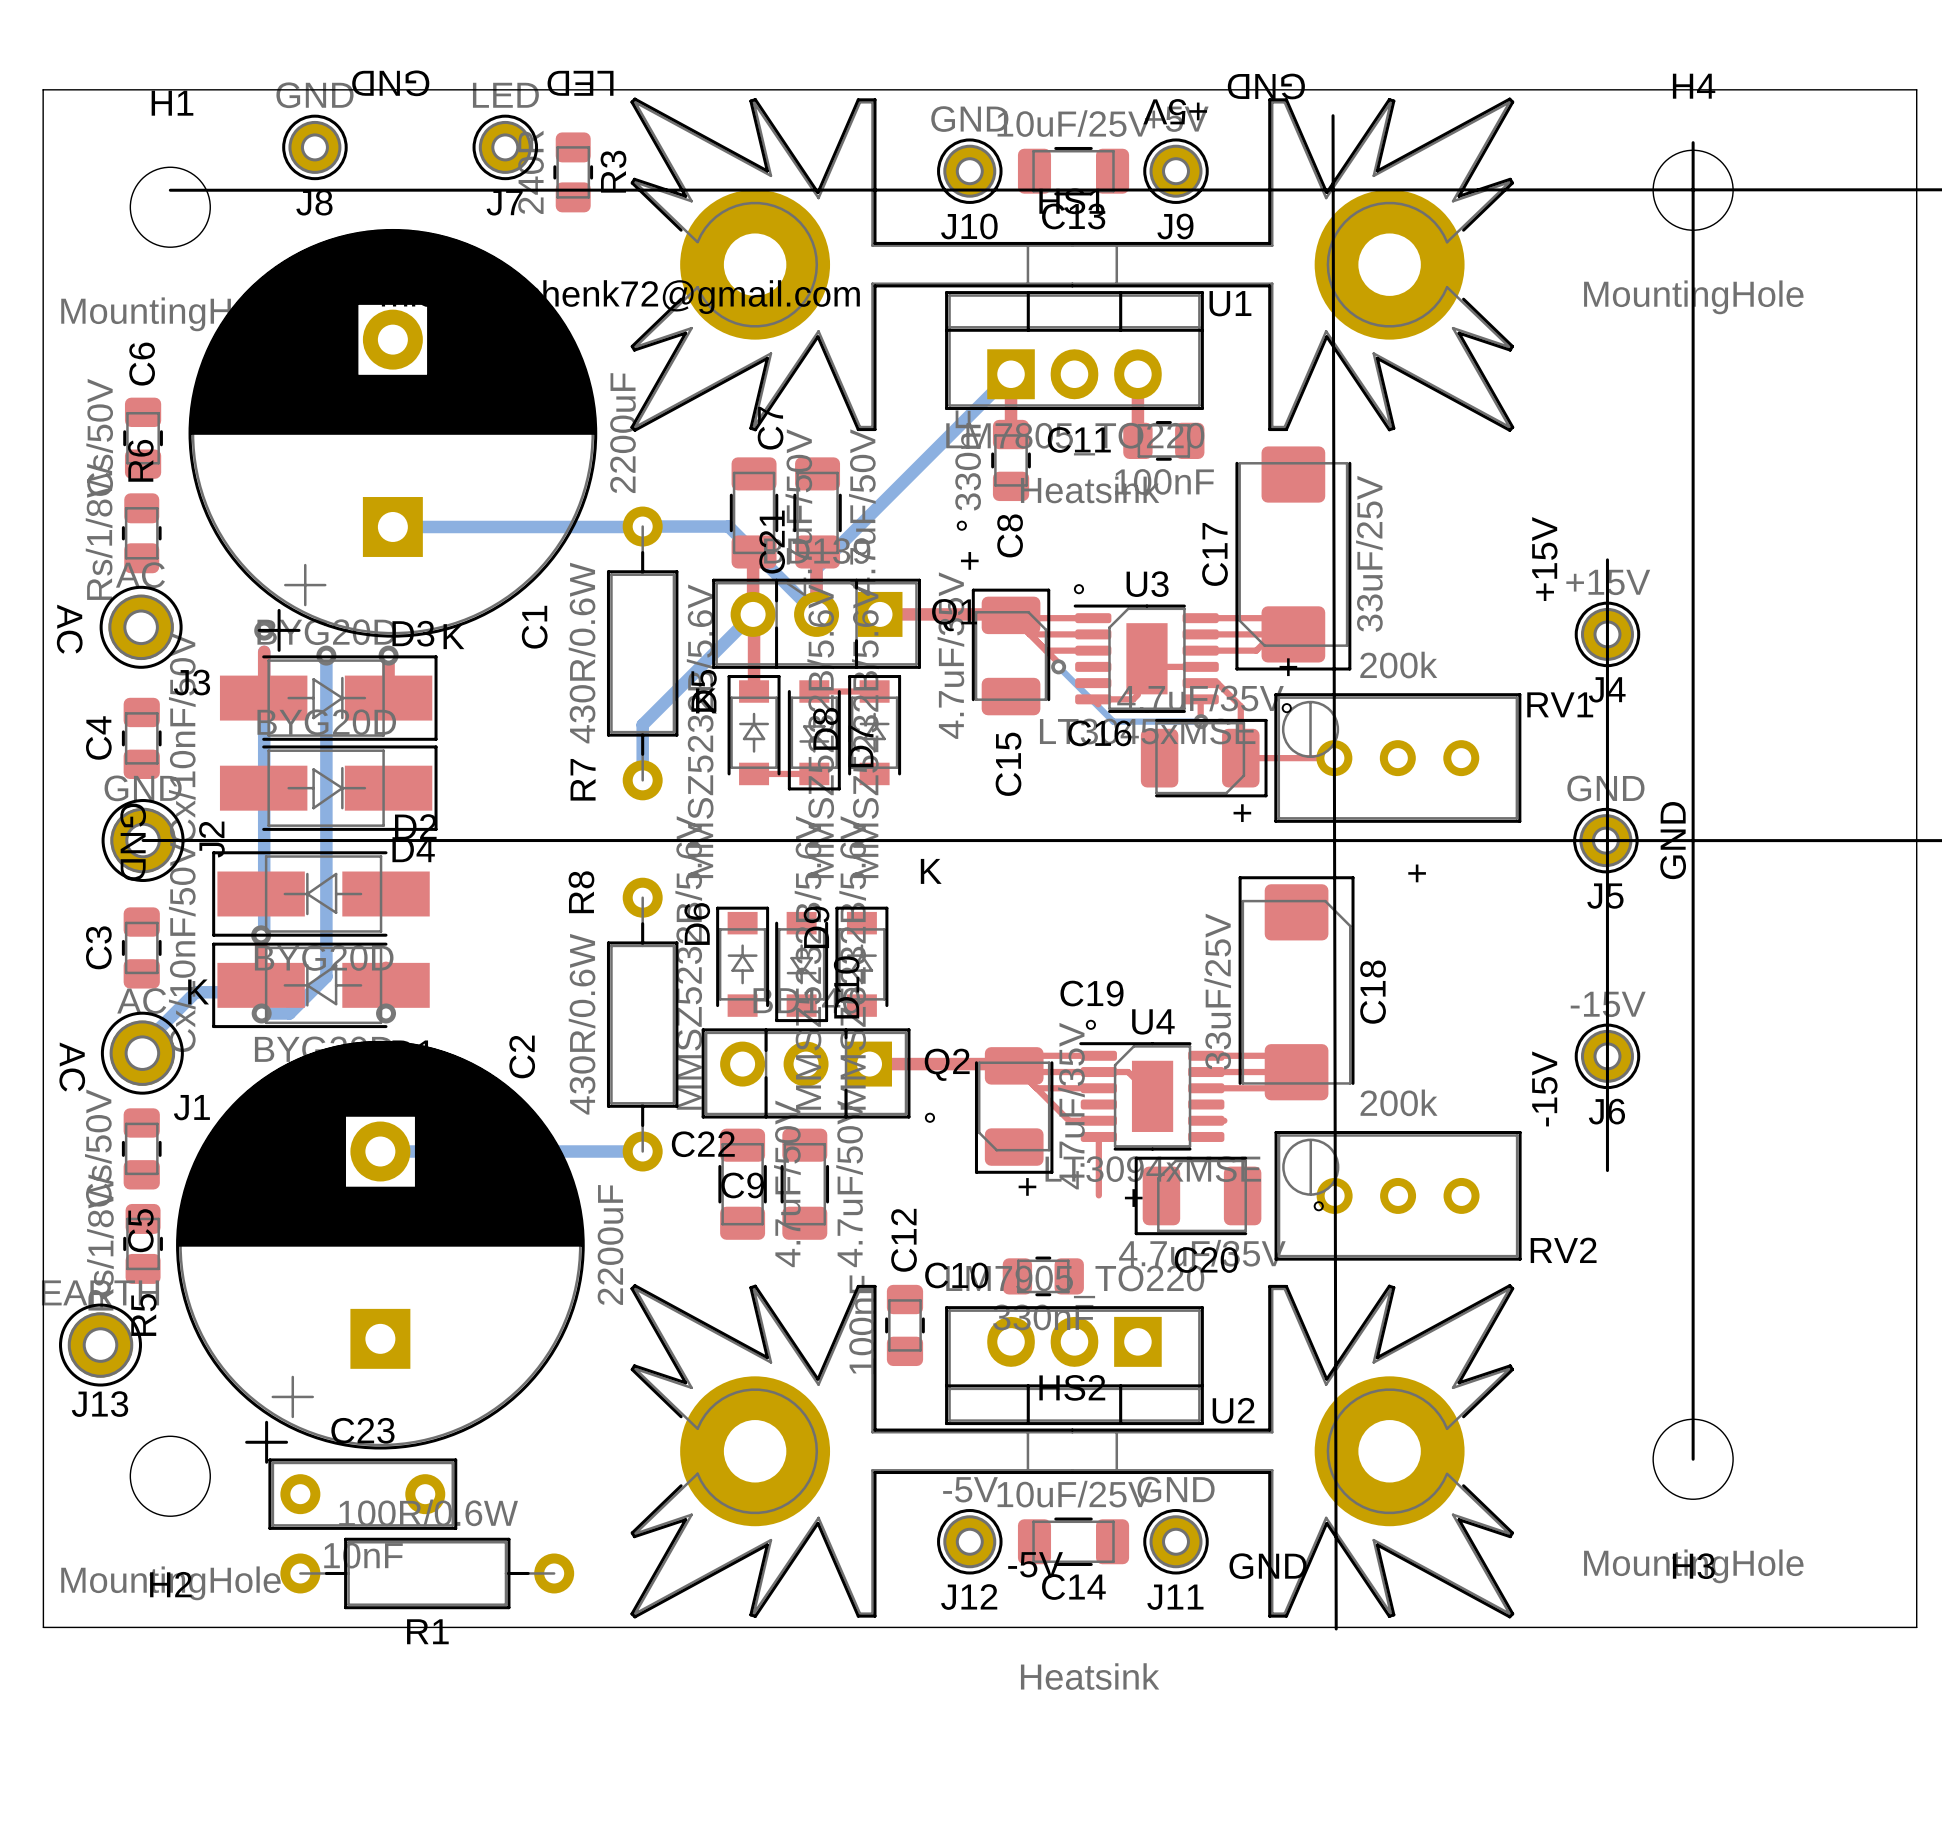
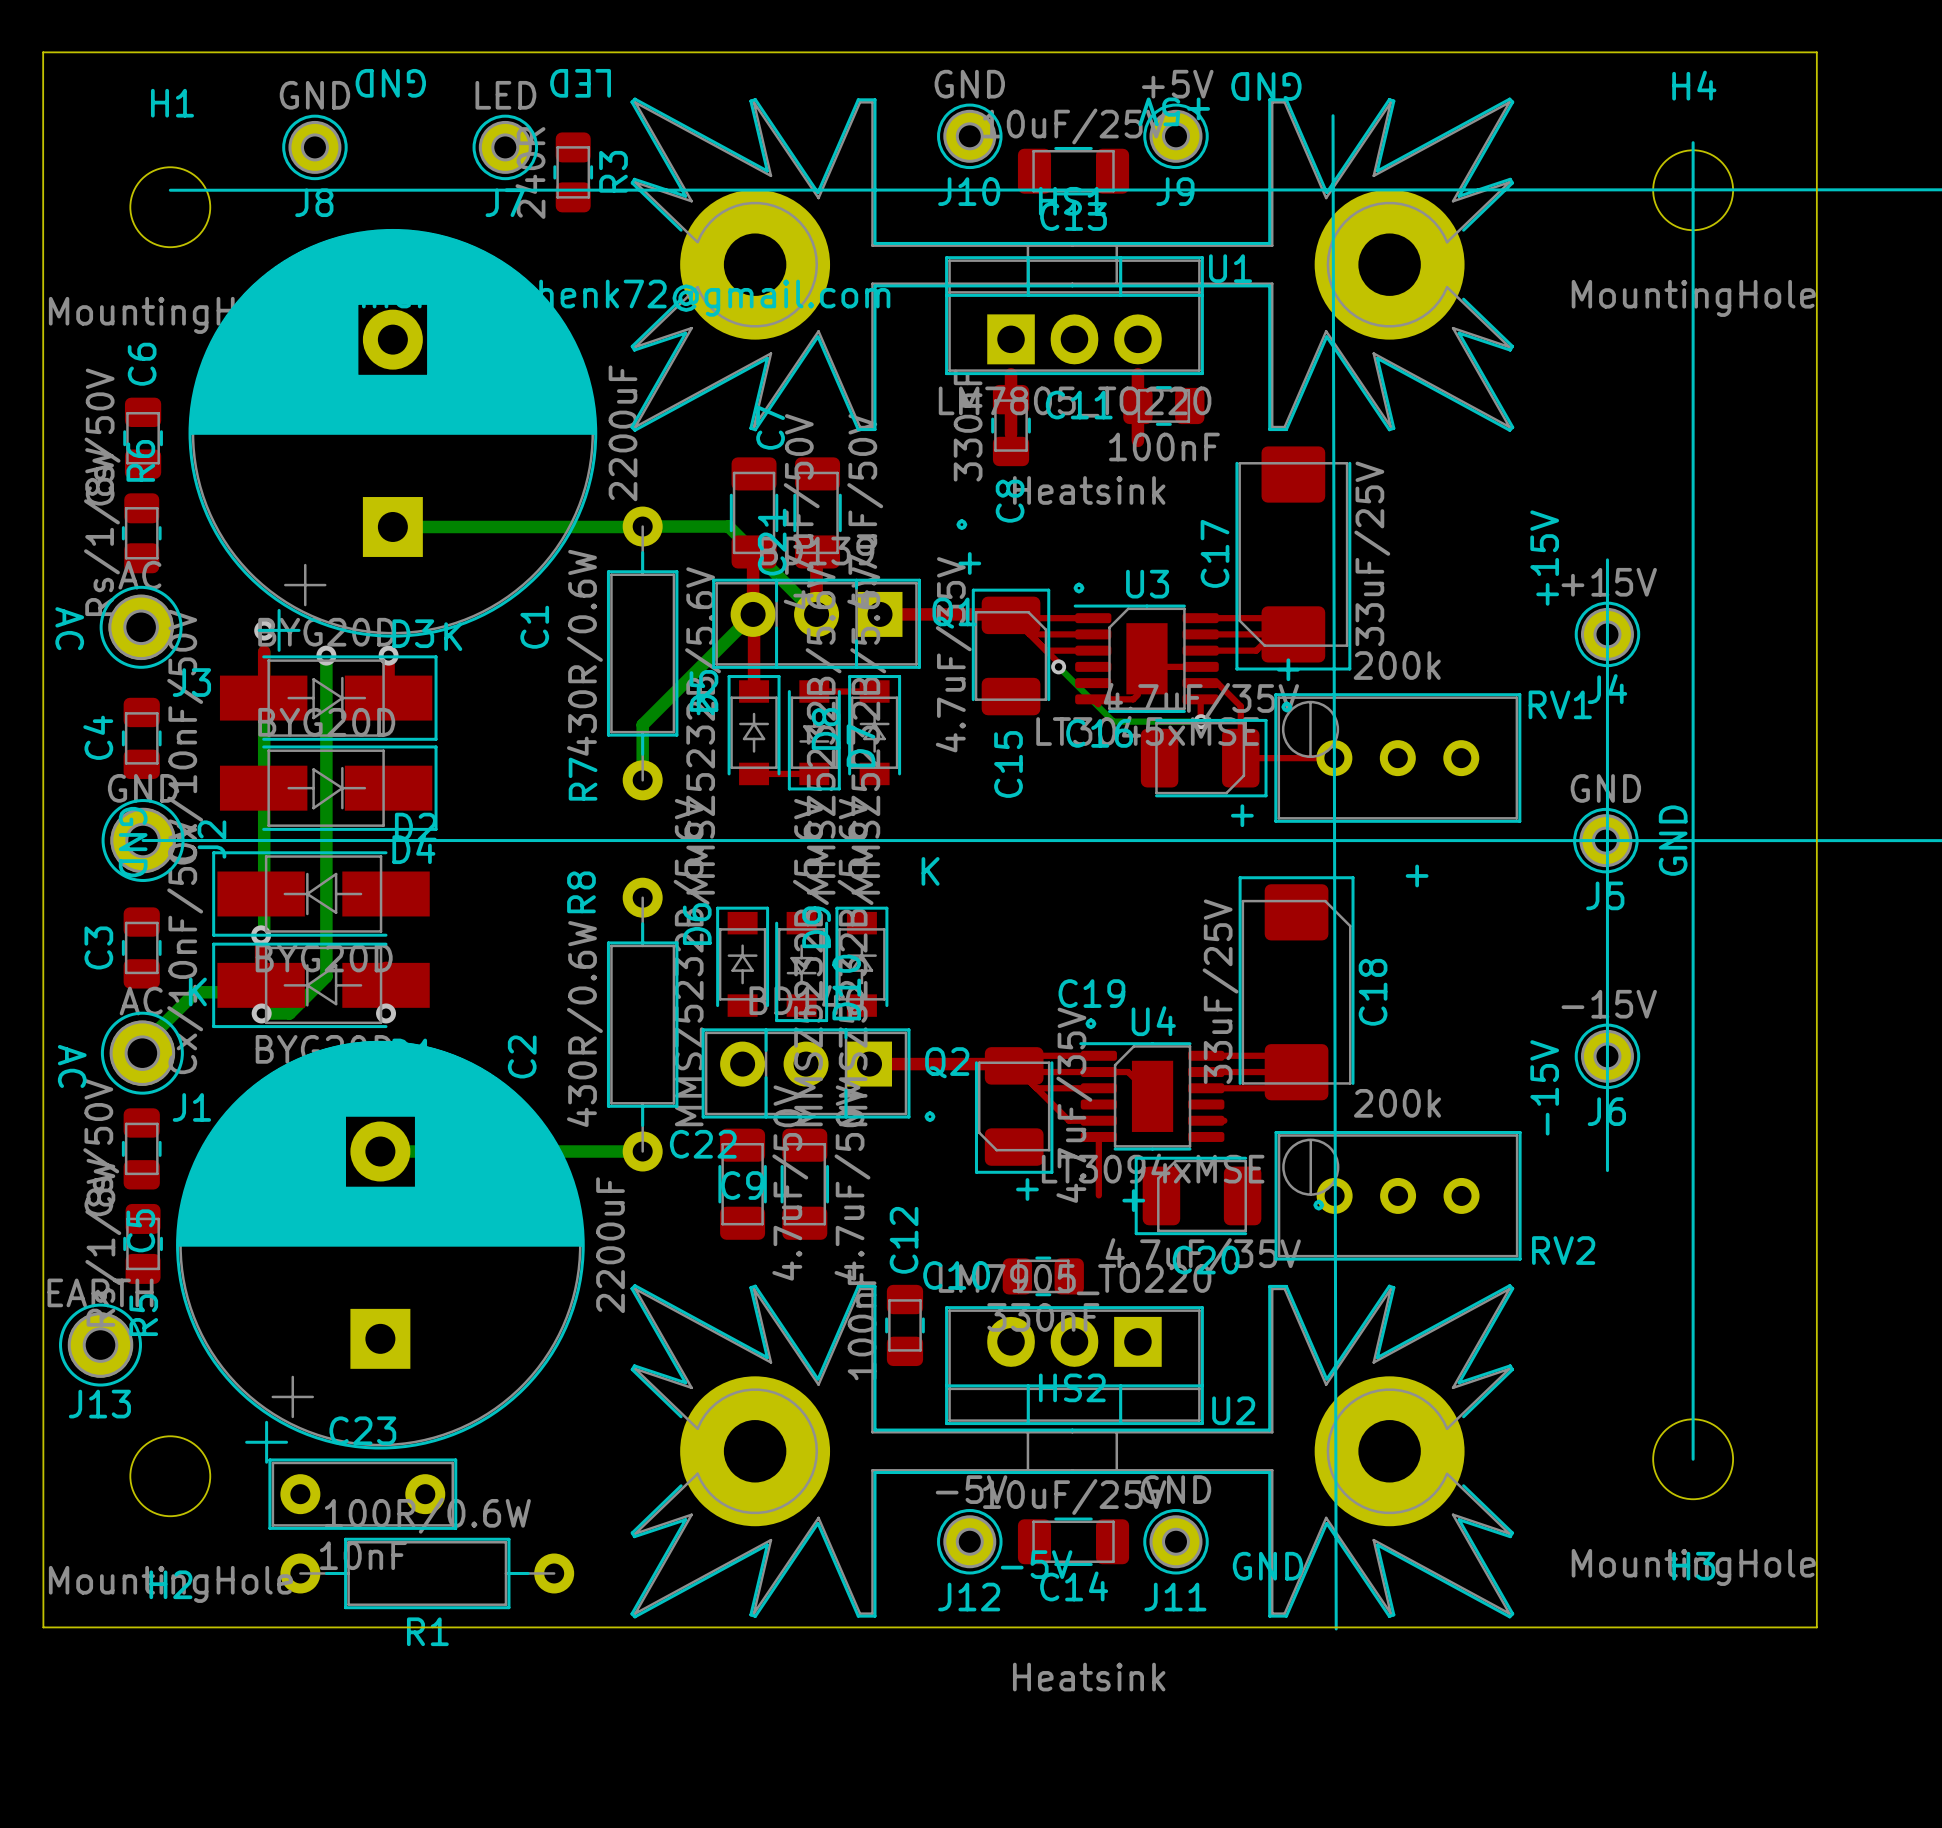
board edge: (43, 89) (1916, 89) (1916, 1627) (1816, 1627) -> (43, 89) (43, 52) (1816, 52) (1816, 1627)
J10 position: (969, 171) -> (969, 136)
J9 position: (1176, 171) -> (1176, 136)
U1 position: (1074, 350) -> (1074, 315)
bottom track: (1011, 374) (816, 568) -> none
C11 position: (1163, 440) -> (1163, 405)
C8 position: (1011, 460) -> (1011, 425)

